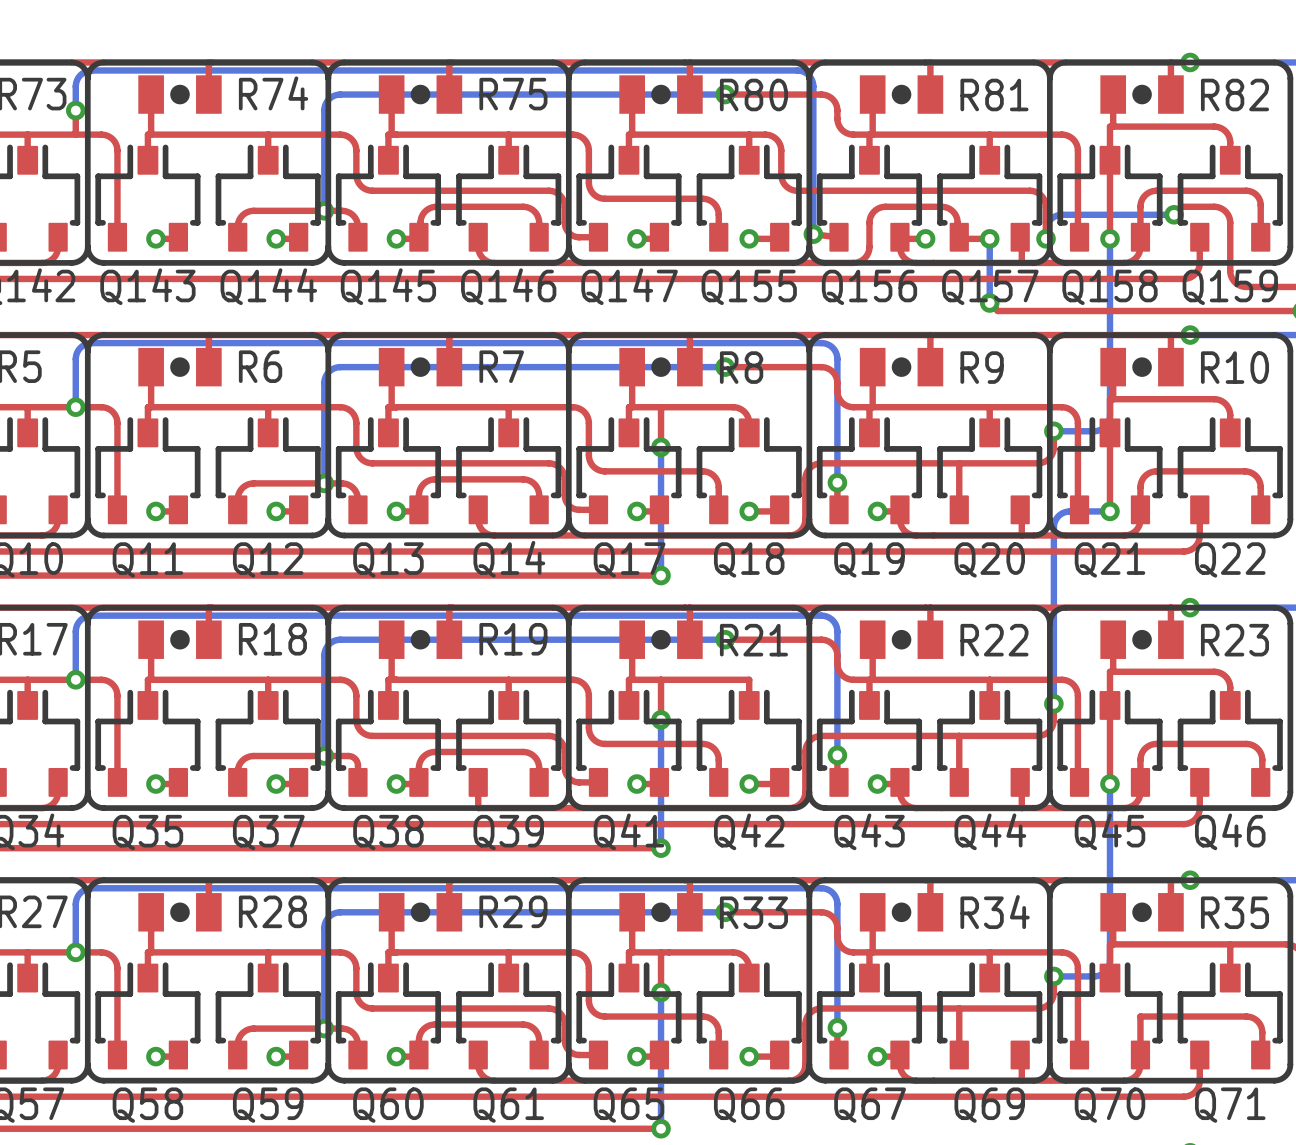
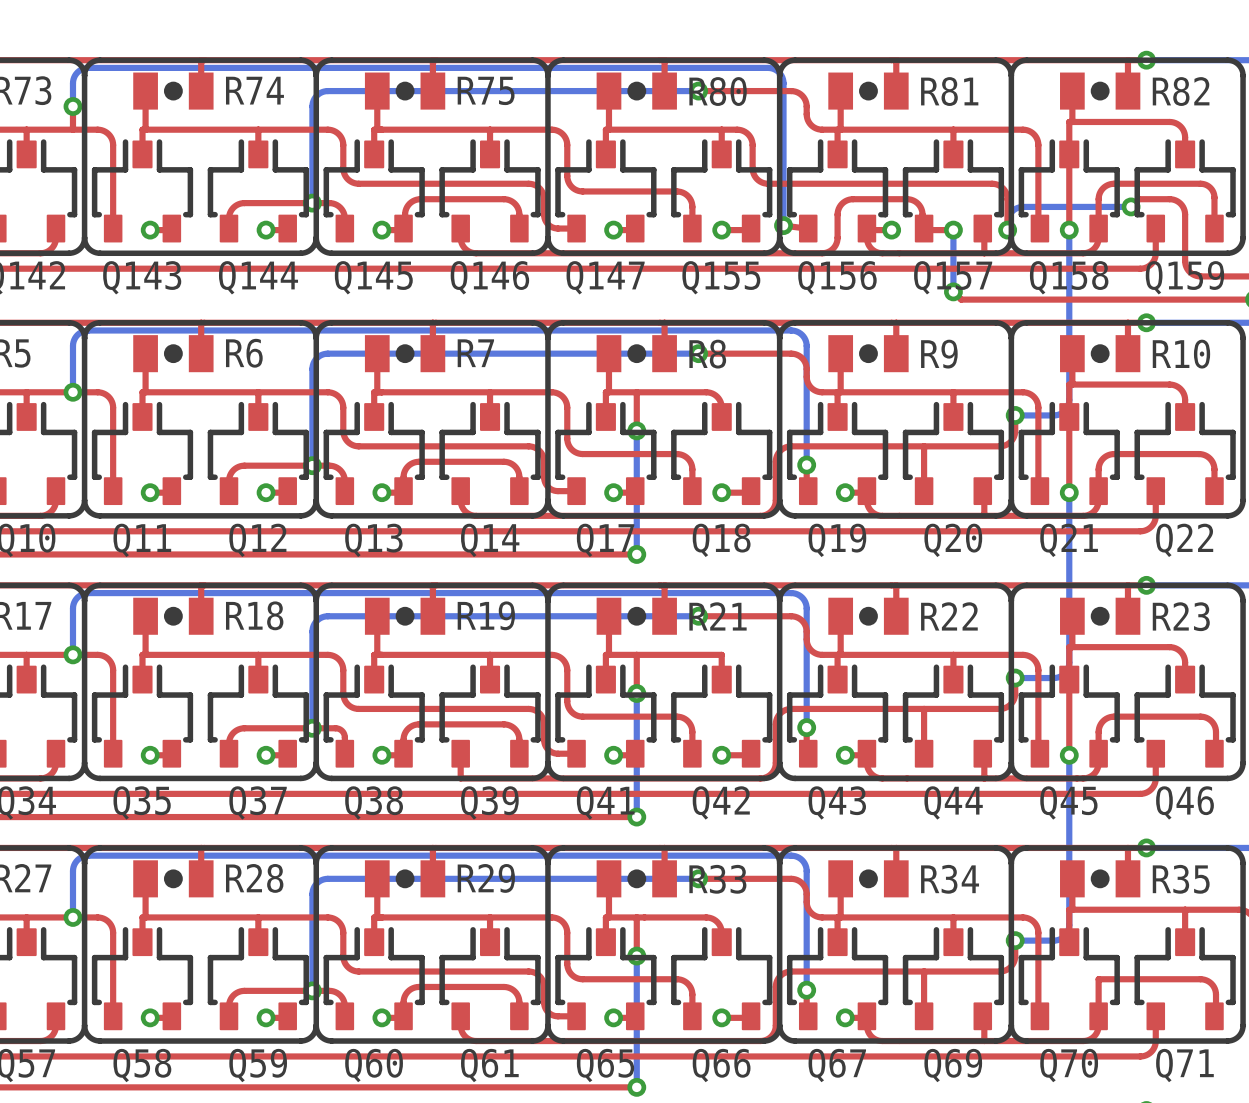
bottom track: (1109, 511) (1065, 511) (1058, 516) (1054, 523) (1053, 703) -> (1069, 492) (1068, 666) (1064, 673) (1057, 677) (1015, 678)

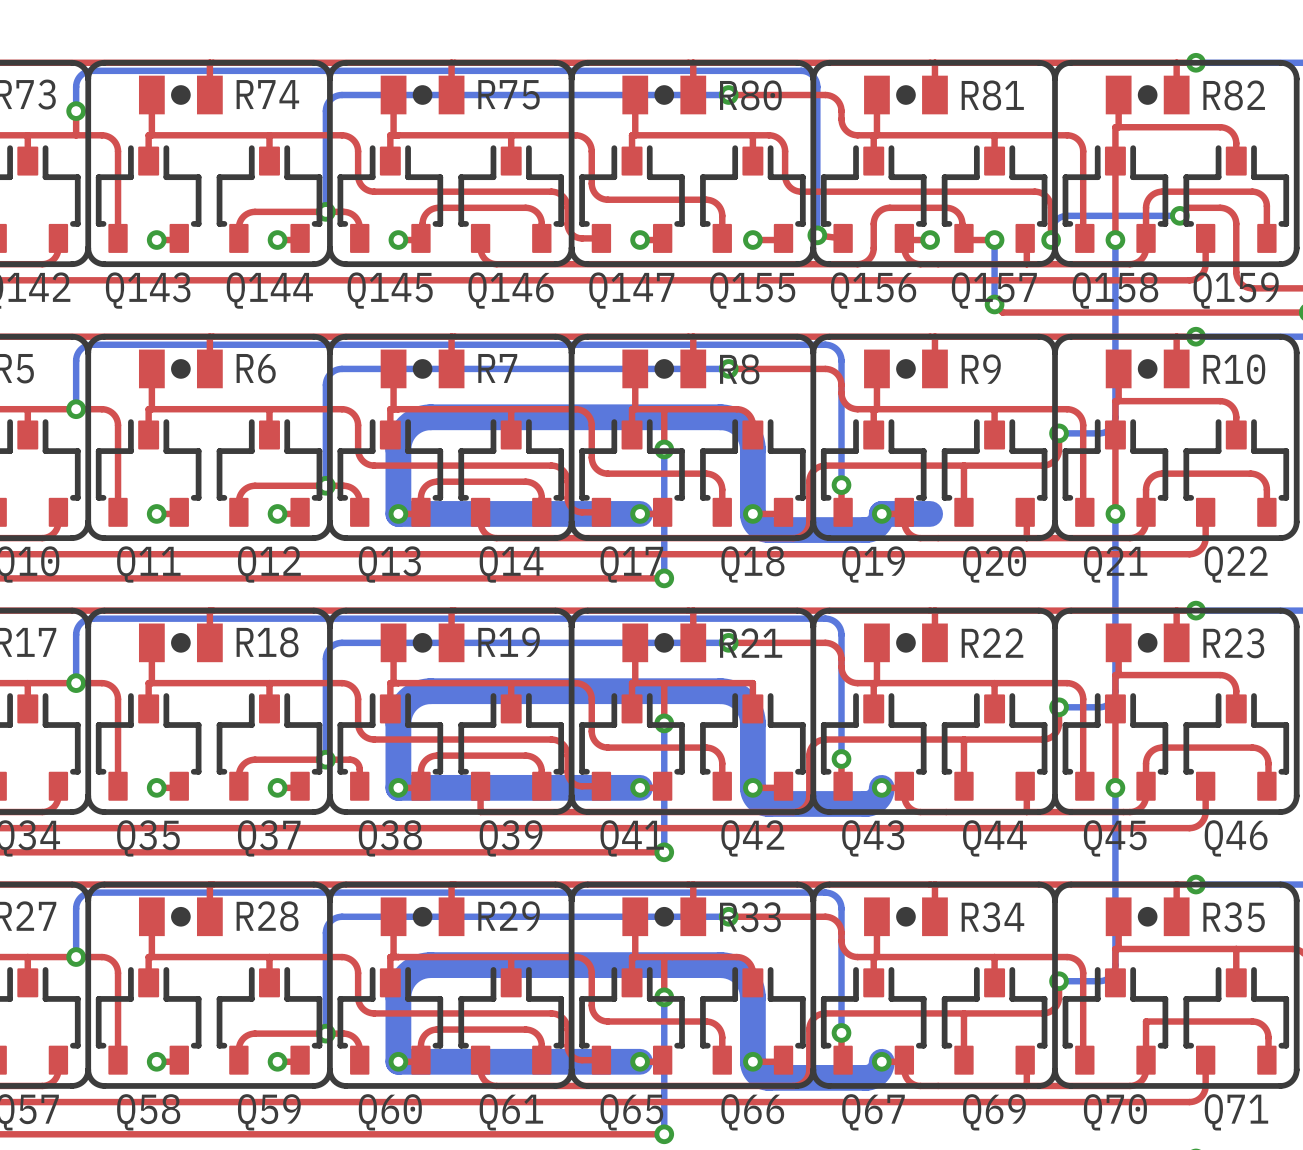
bottom track: none -> (640, 513) (398, 513) (399, 441) (405, 429) (411, 423) (426, 417) (724, 417) (740, 423) (750, 437) (752, 449) (753, 516) (756, 523) (762, 528) (867, 529) (877, 525) (881, 513) (930, 513)
bottom track: none -> (640, 787) (398, 787) (399, 715) (405, 703) (411, 697) (426, 691) (724, 691) (740, 697) (746, 703) (751, 715) (753, 789) (756, 797) (760, 801) (769, 803) (867, 803) (877, 799) (881, 787)
bottom track: none -> (640, 1061) (398, 1061) (399, 988) (405, 977) (411, 971) (426, 965) (724, 965) (740, 971) (746, 977) (751, 988) (753, 1063) (756, 1071) (760, 1075) (769, 1077) (867, 1077) (877, 1073) (881, 1061)

